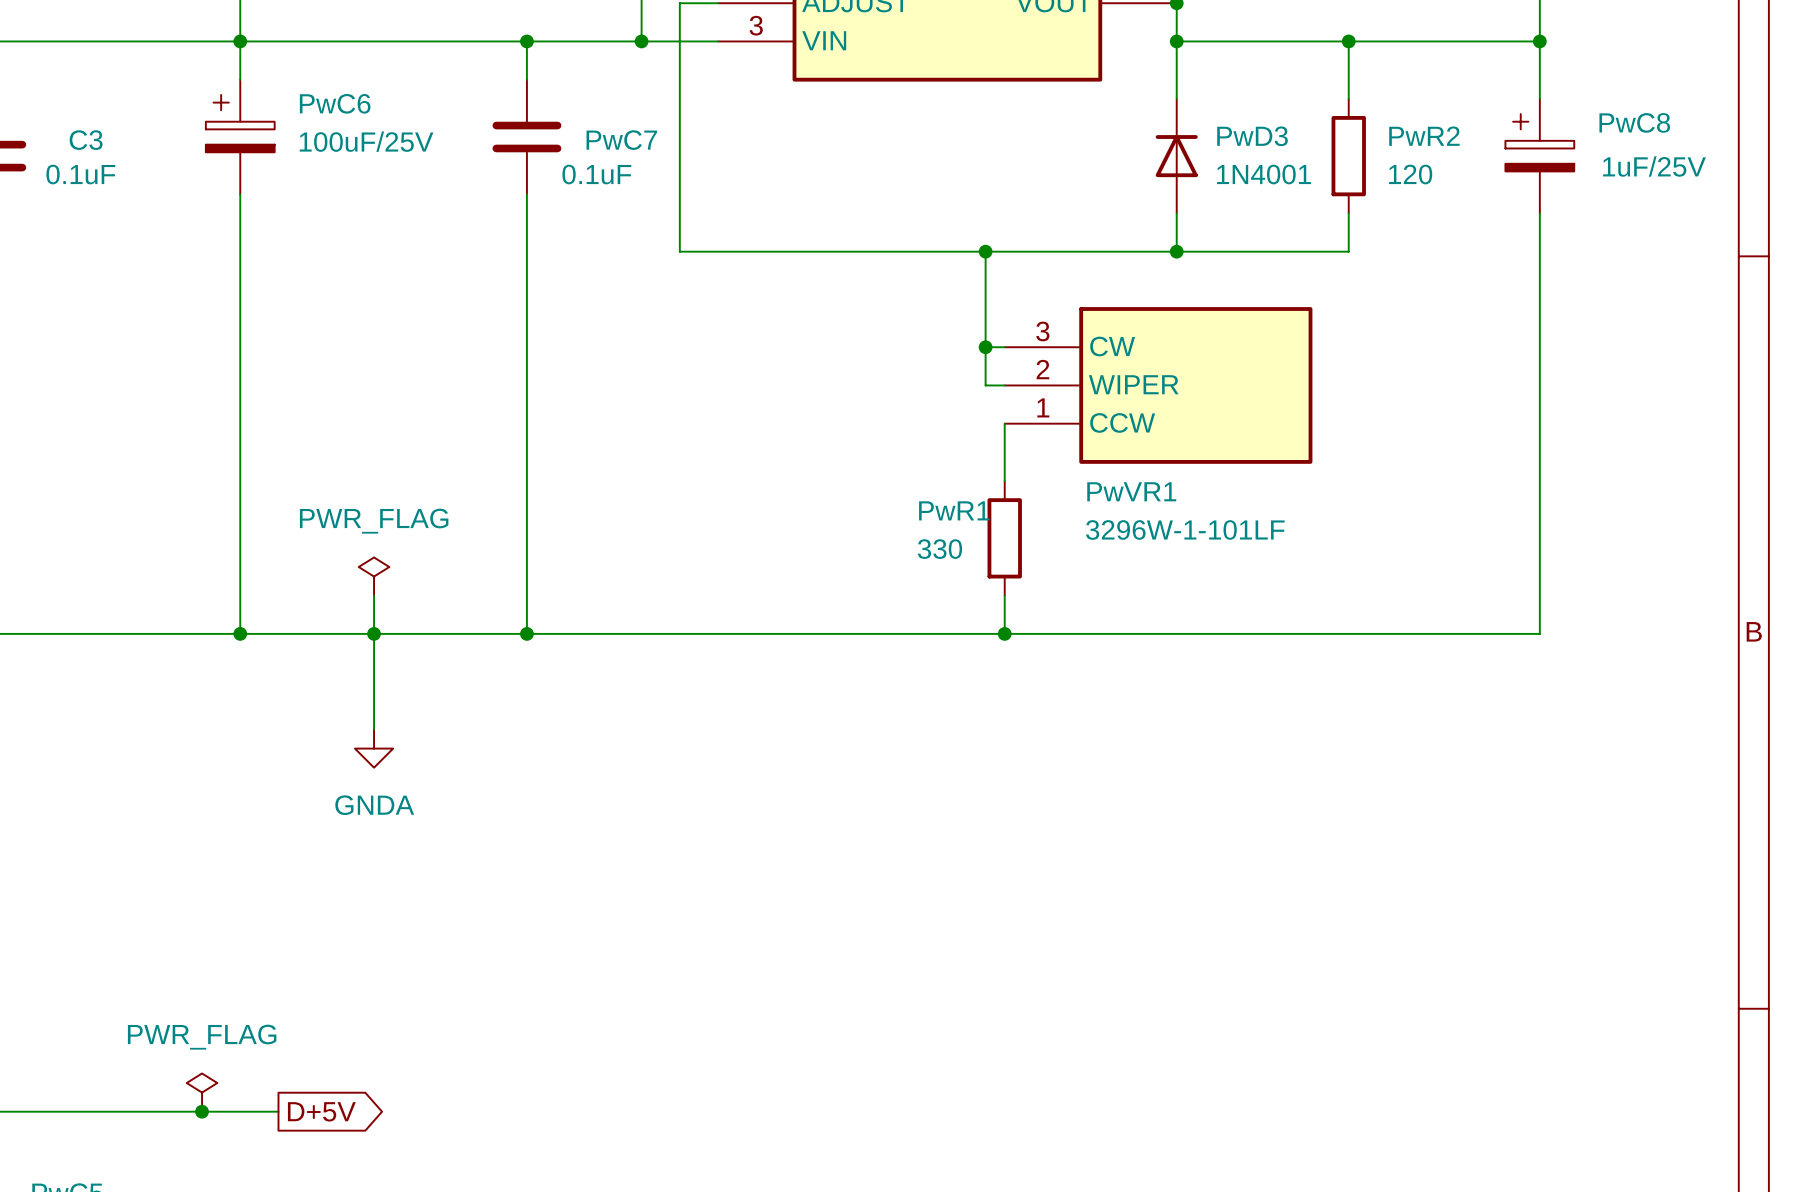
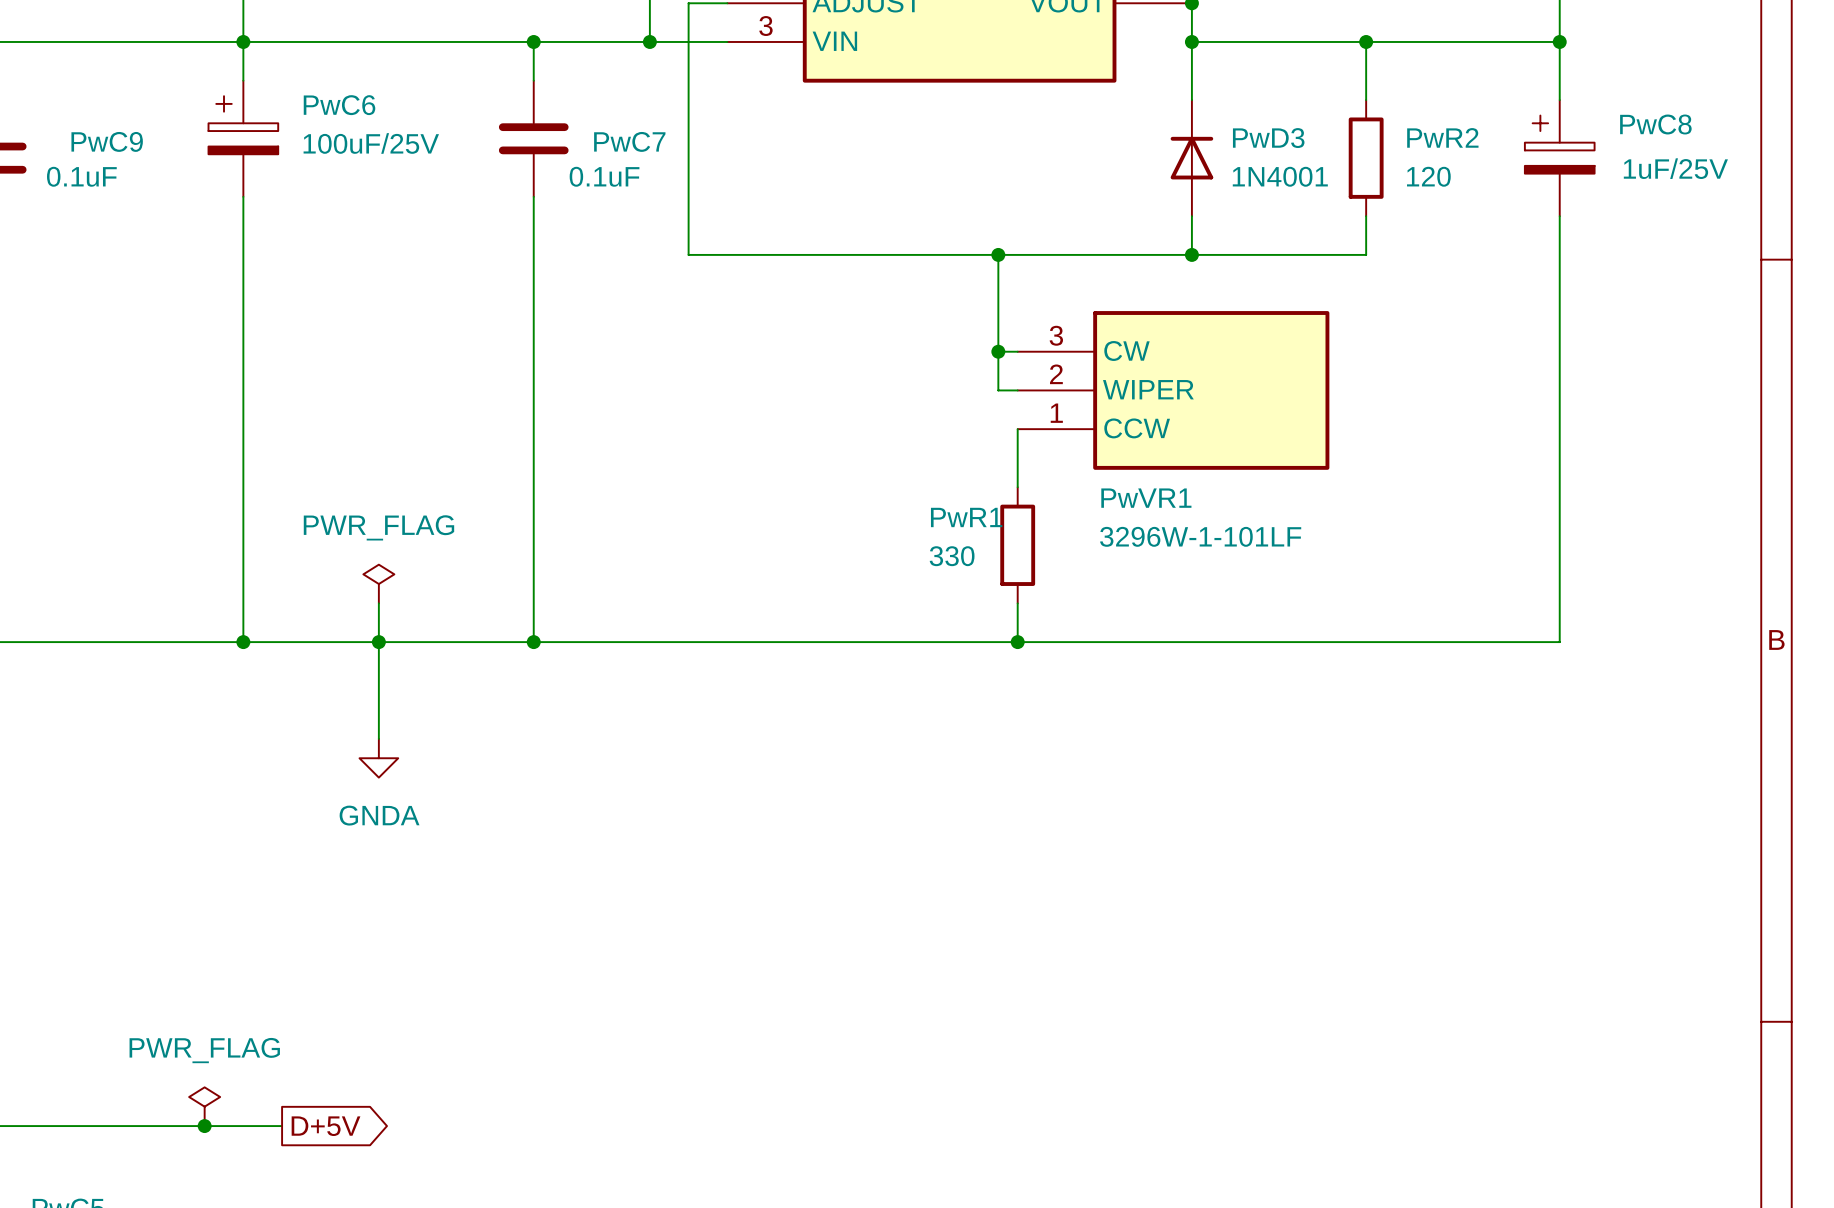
C3 name: C3 (86, 140) -> PwC9 (107, 141)

